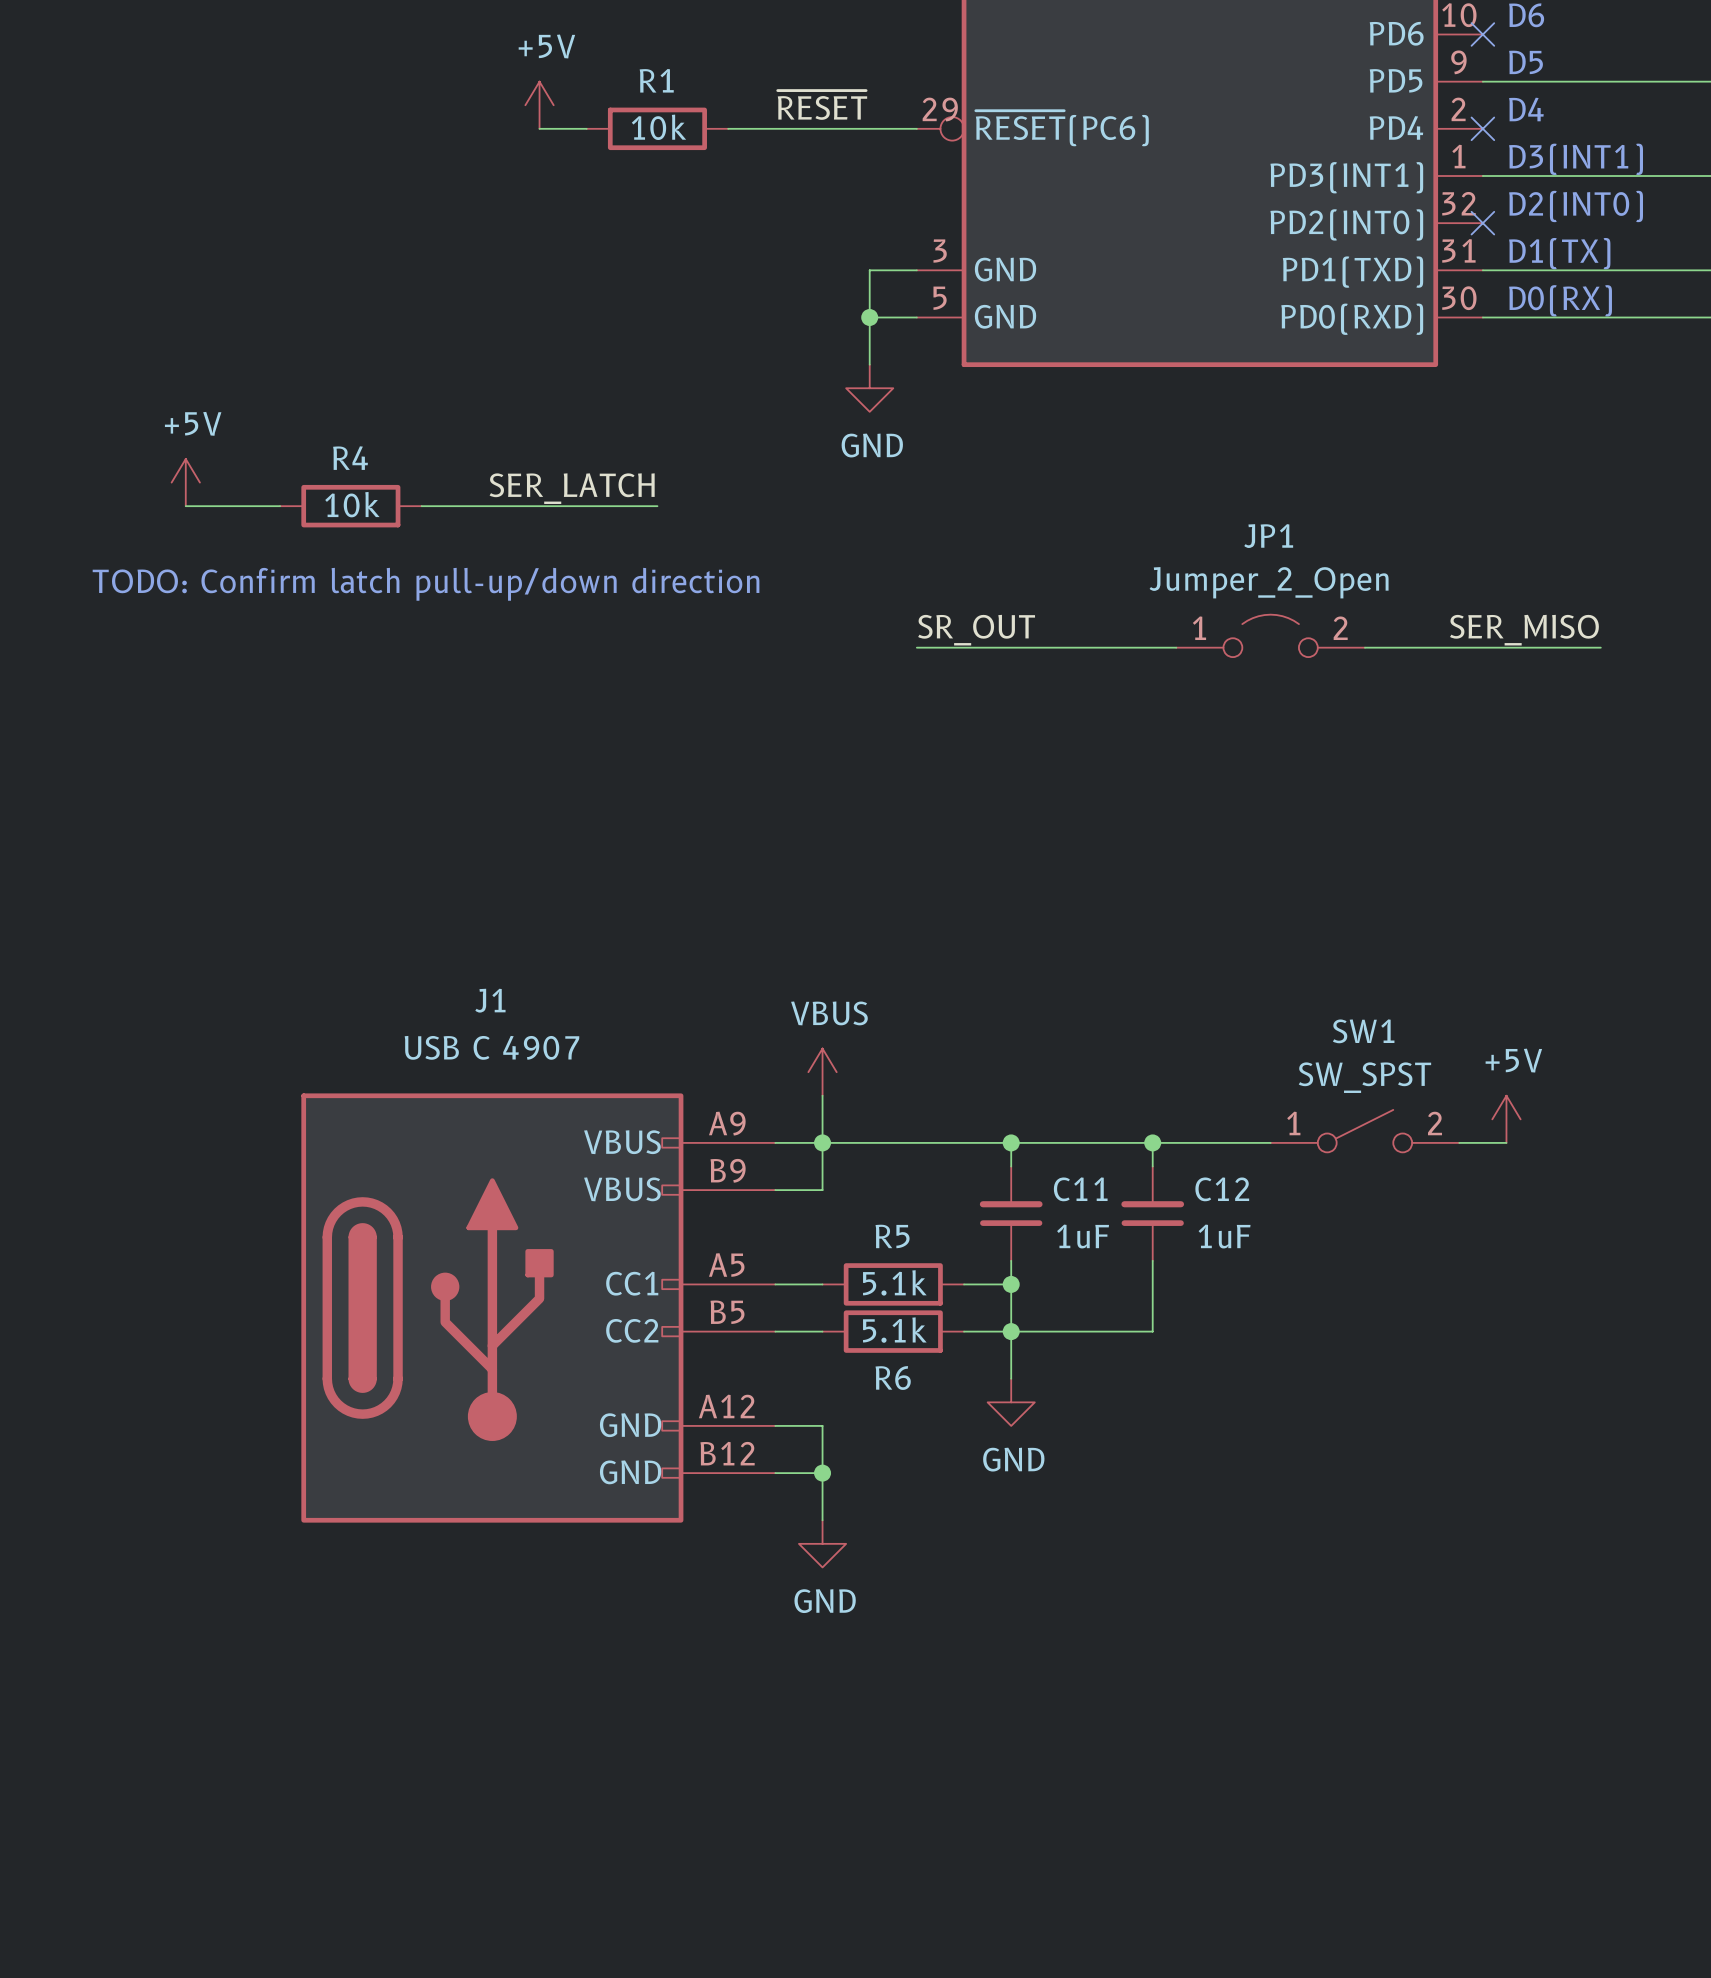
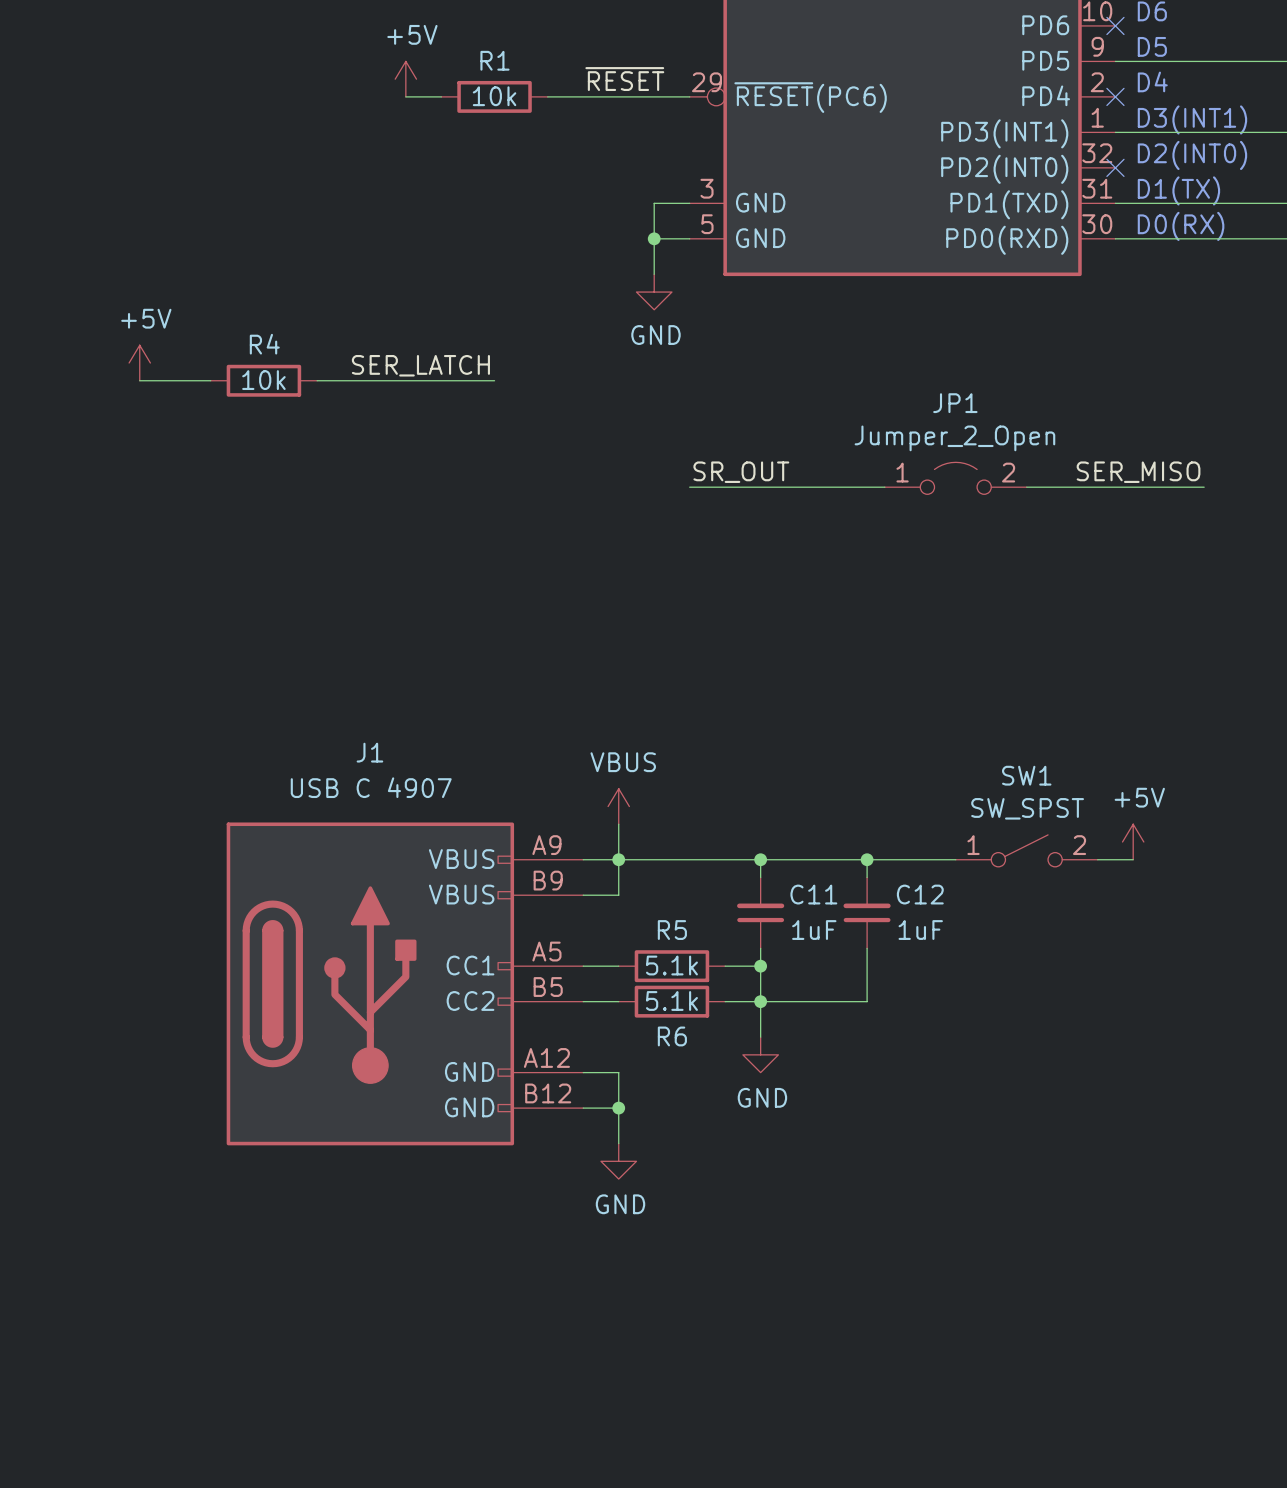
text: TODO: Confirm latch pull-up/down direction (426, 584) -> none

